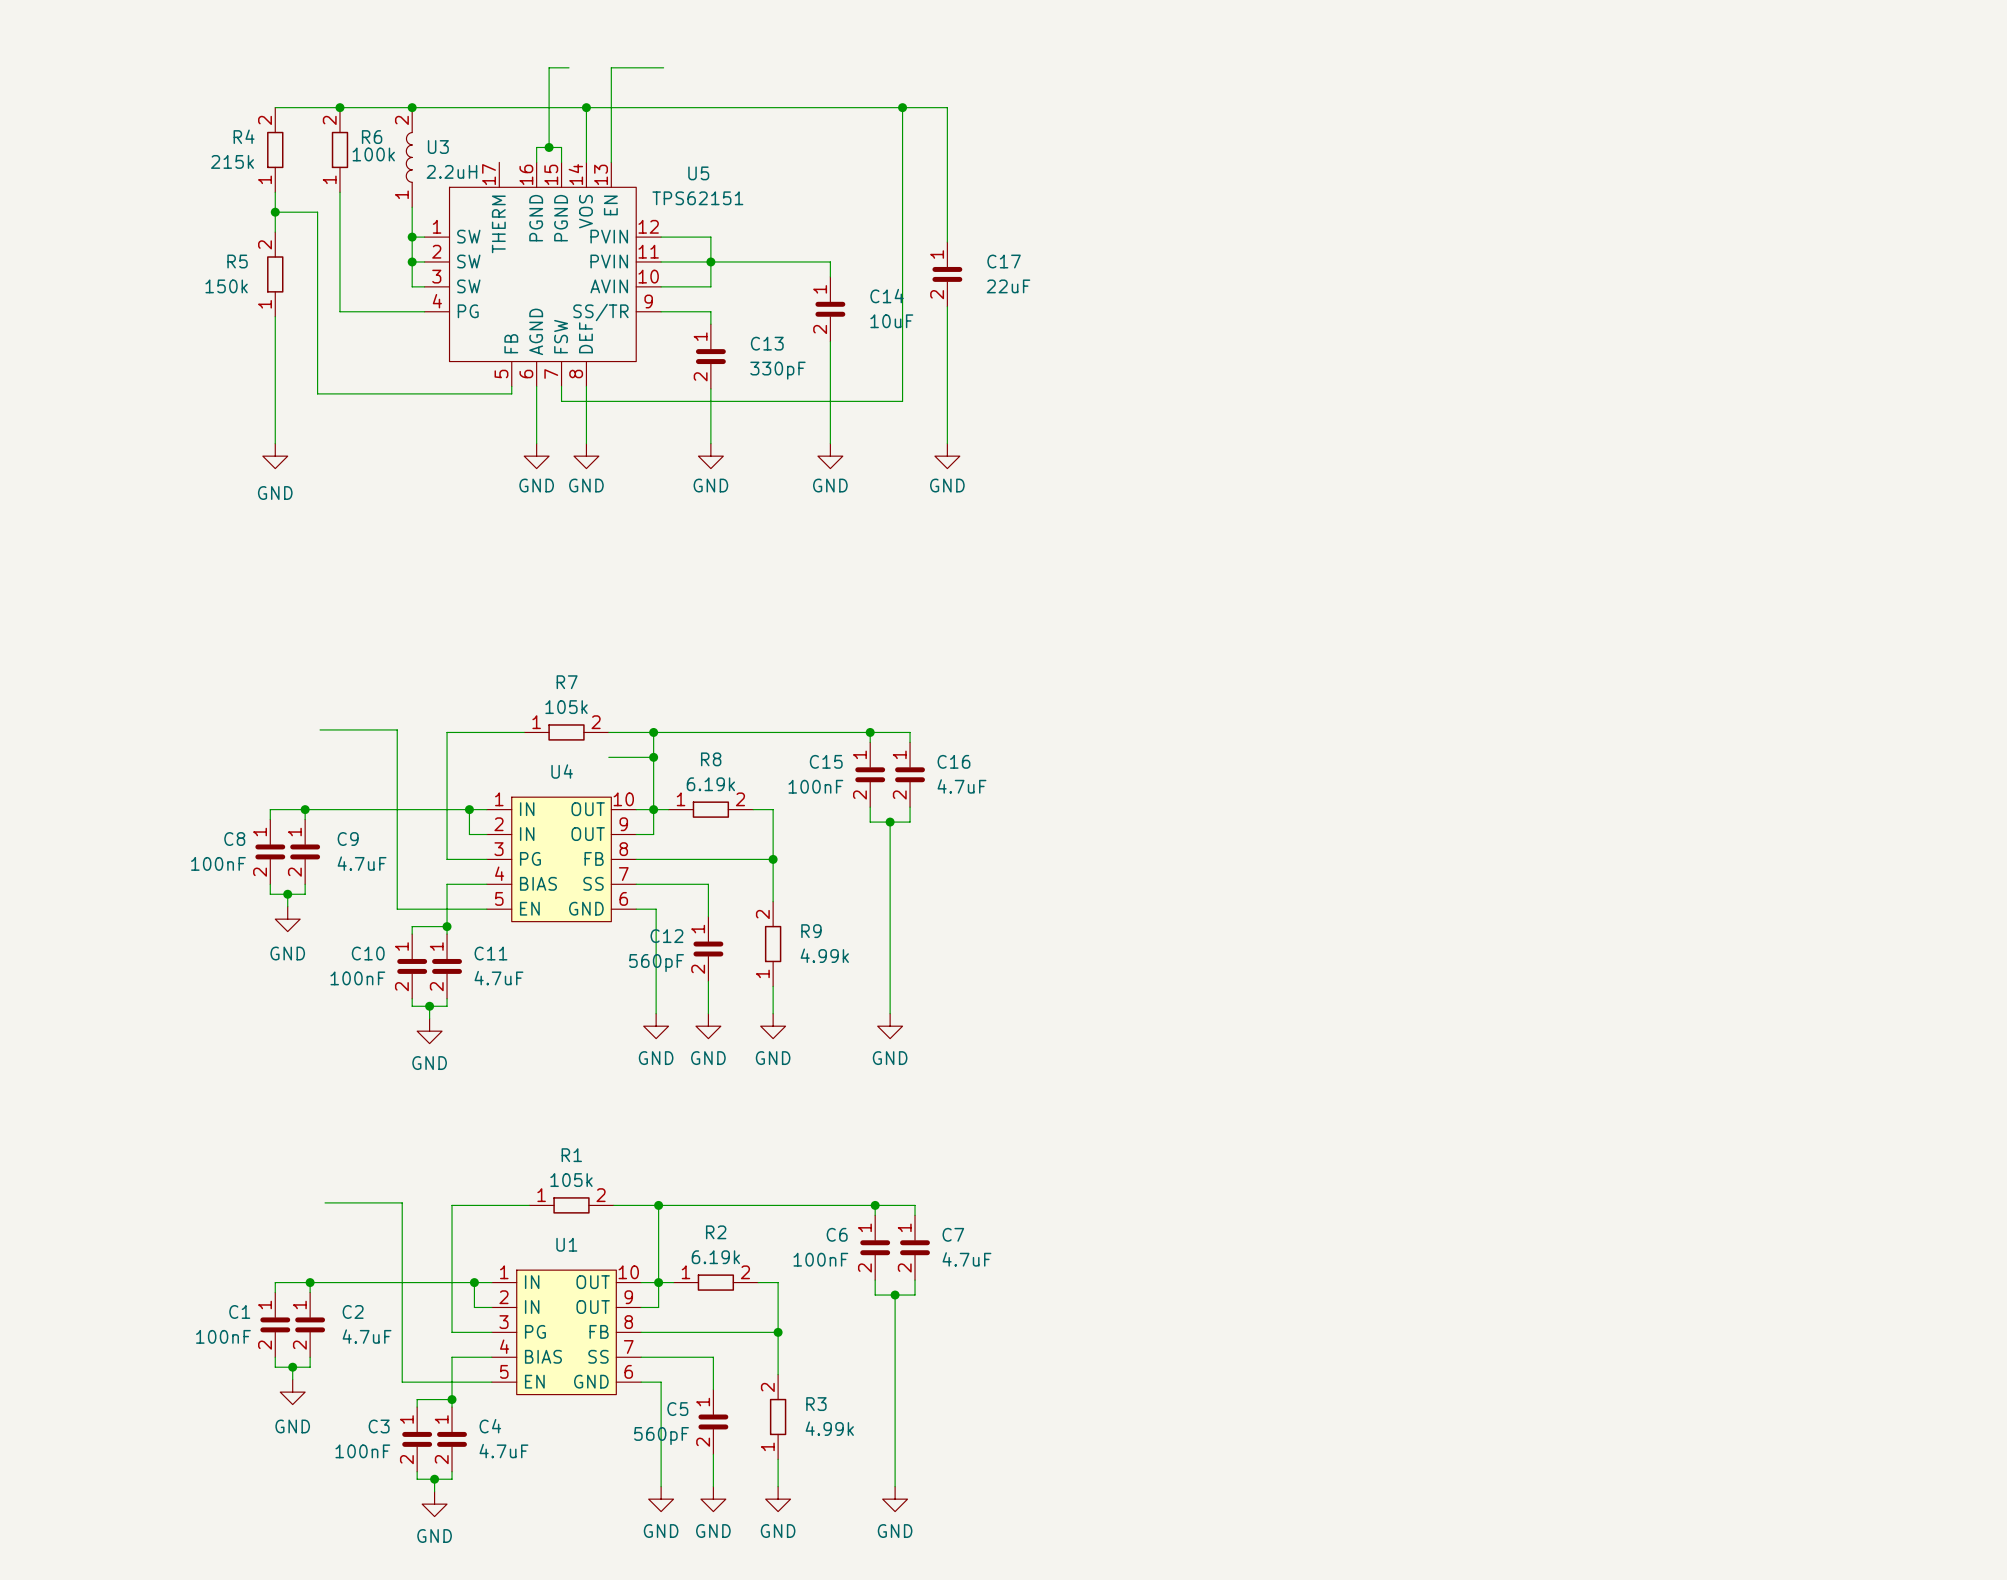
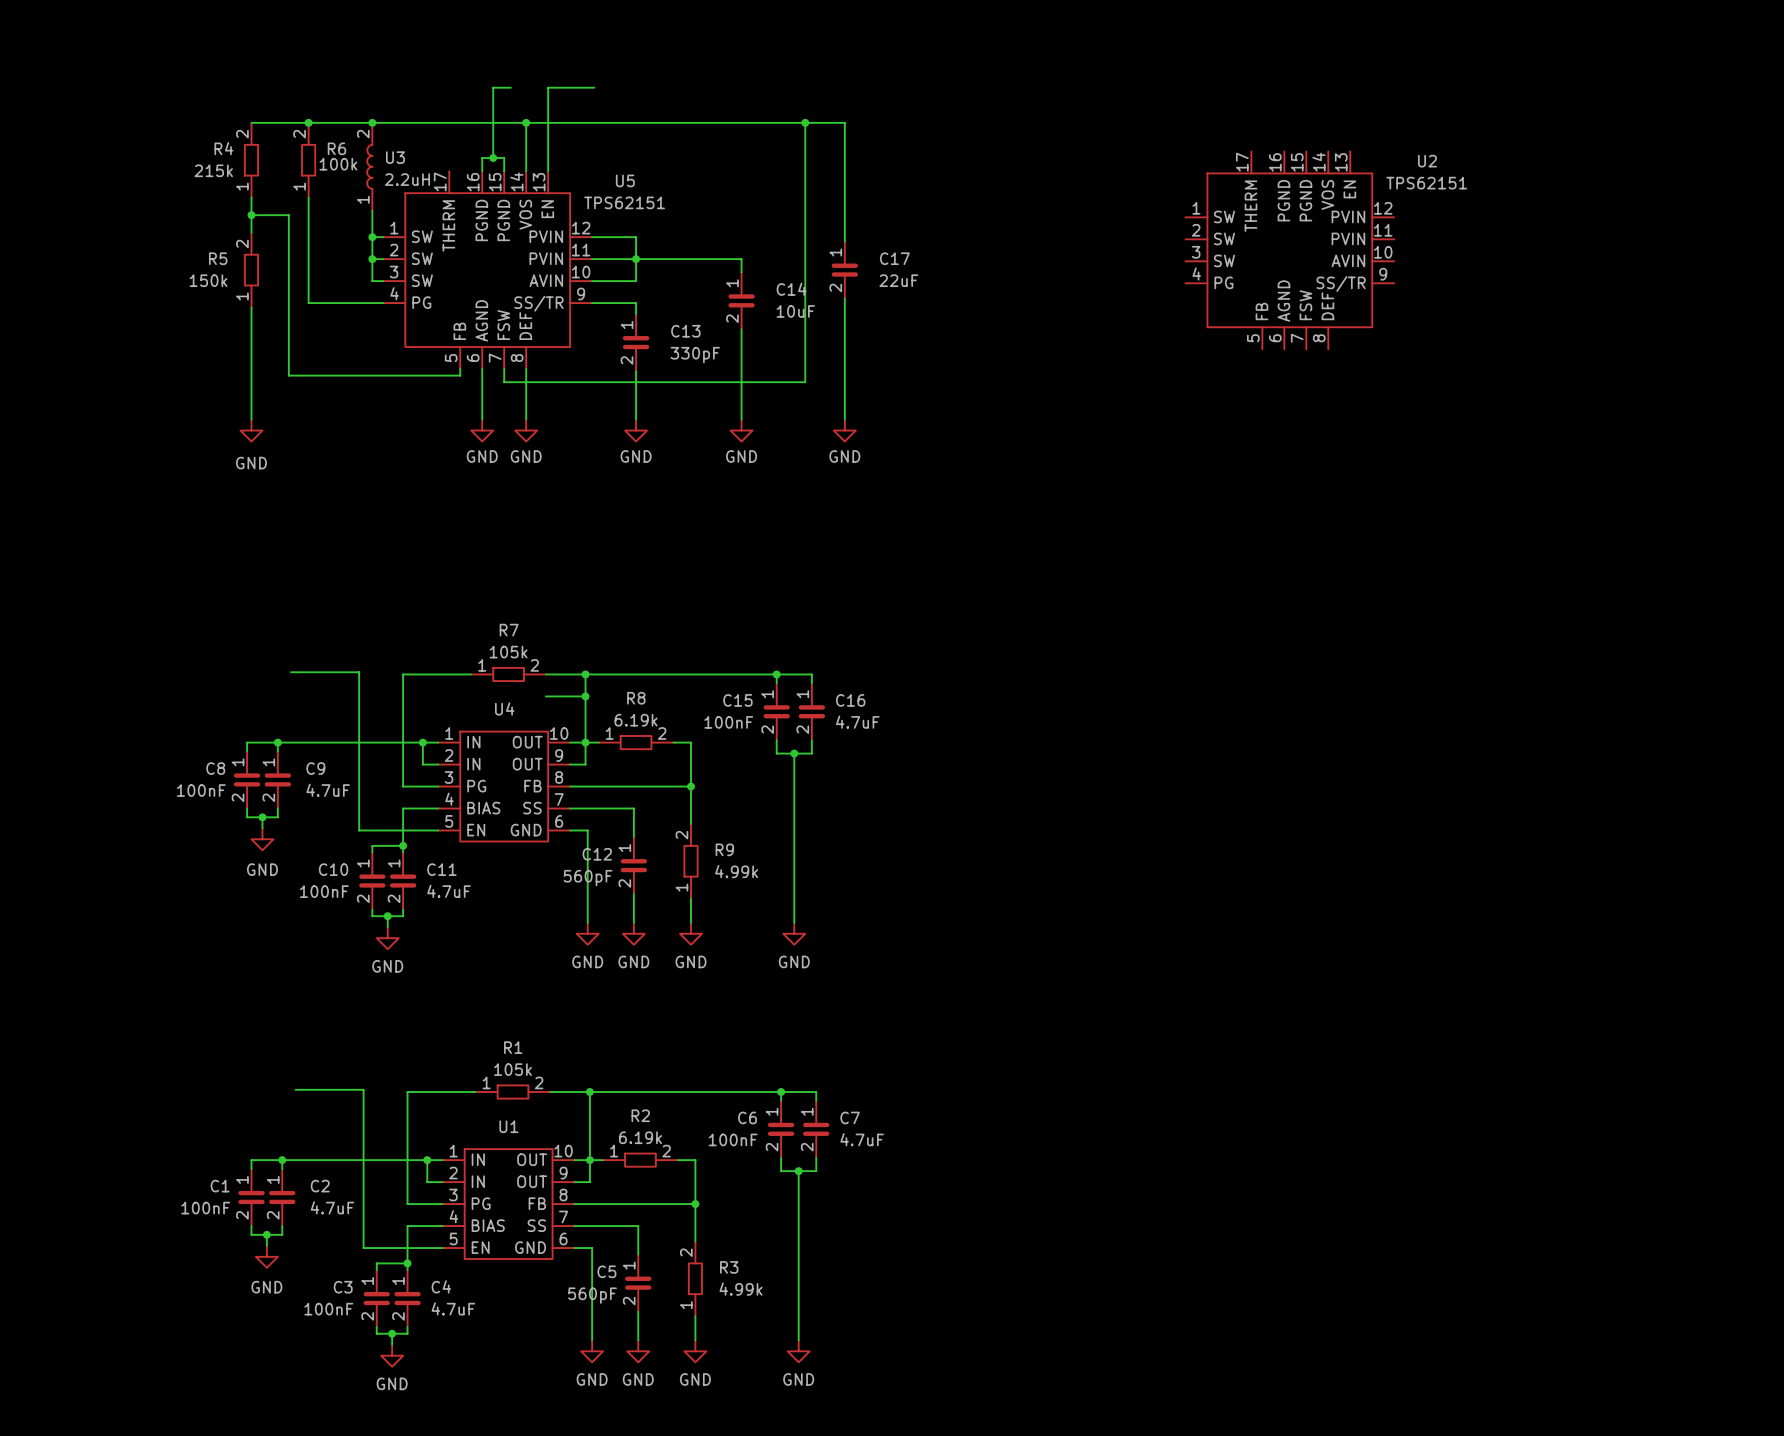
U2: none -> TPS62151 (1289, 250)

